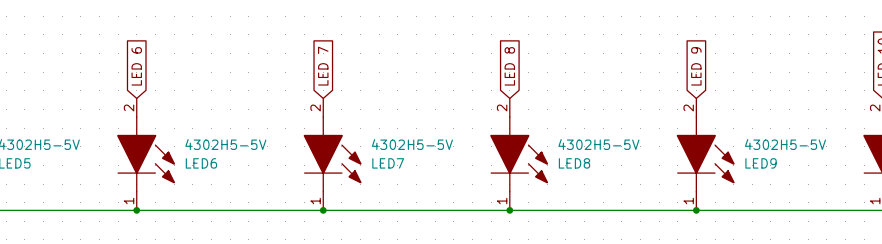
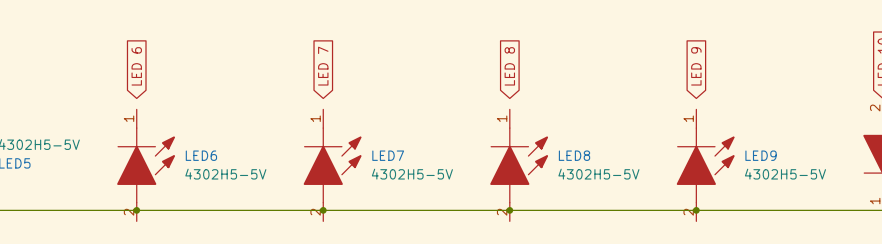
LED6 flip: as is (146, 154) -> up-down (146, 165)
LED7 flip: as is (332, 154) -> up-down (332, 165)
LED8 flip: as is (519, 154) -> up-down (519, 165)
LED9 flip: as is (705, 154) -> up-down (705, 165)

